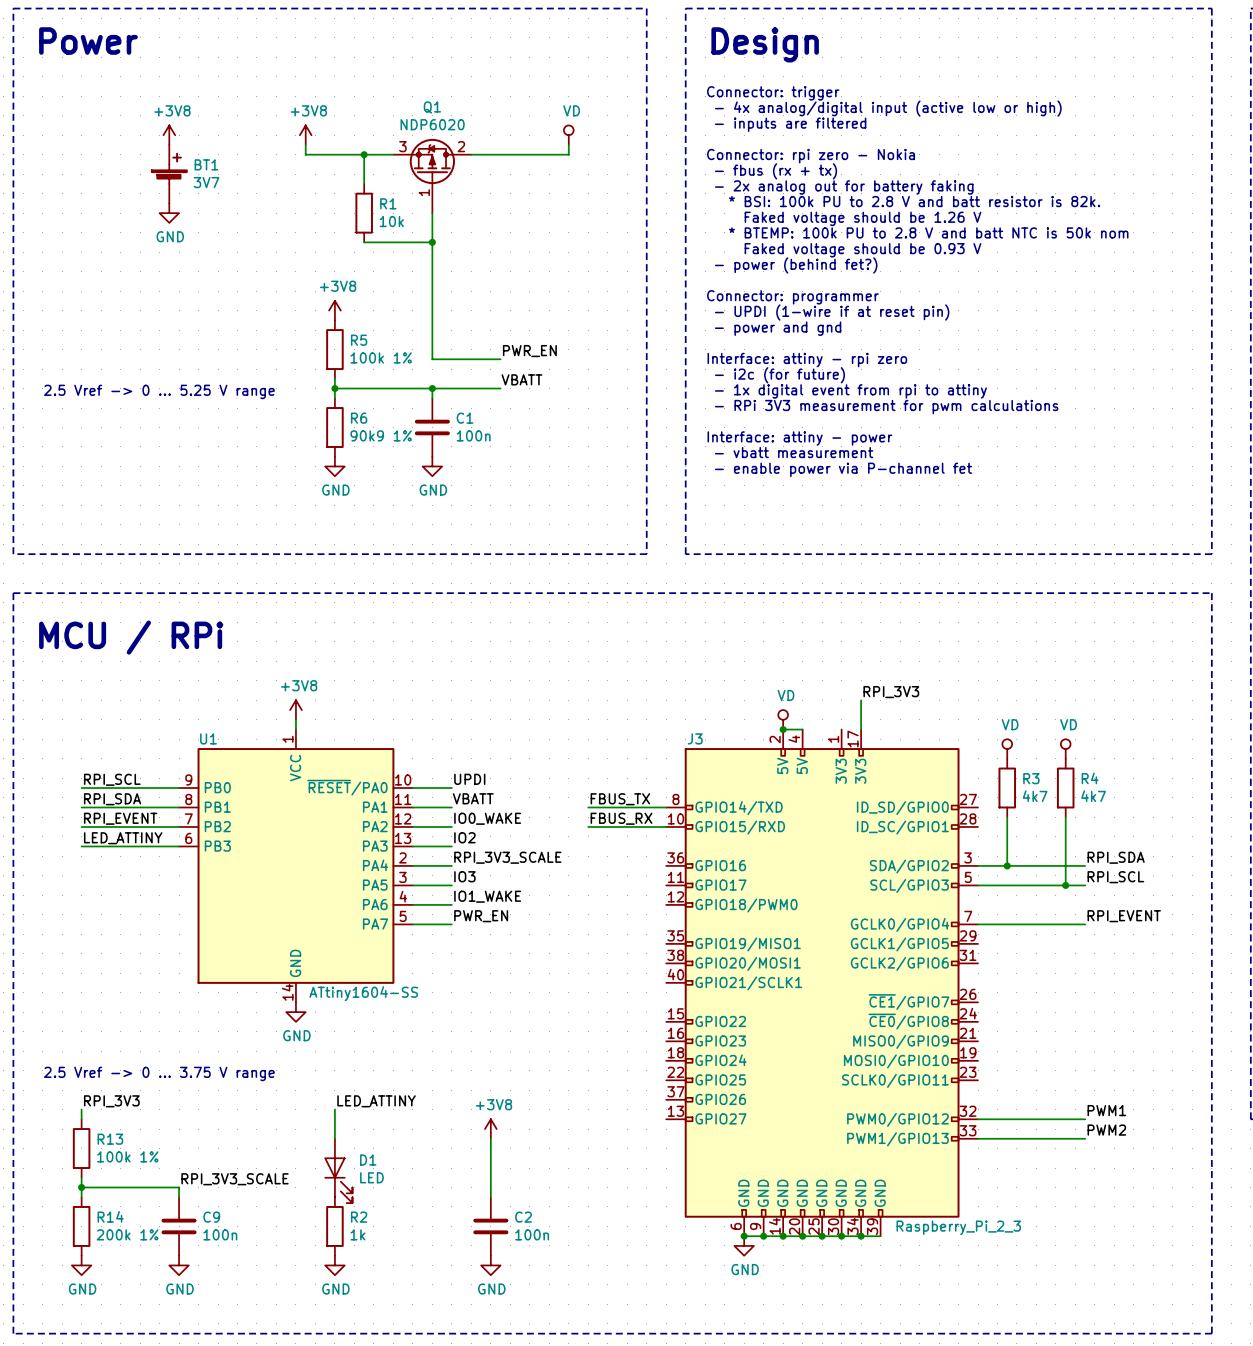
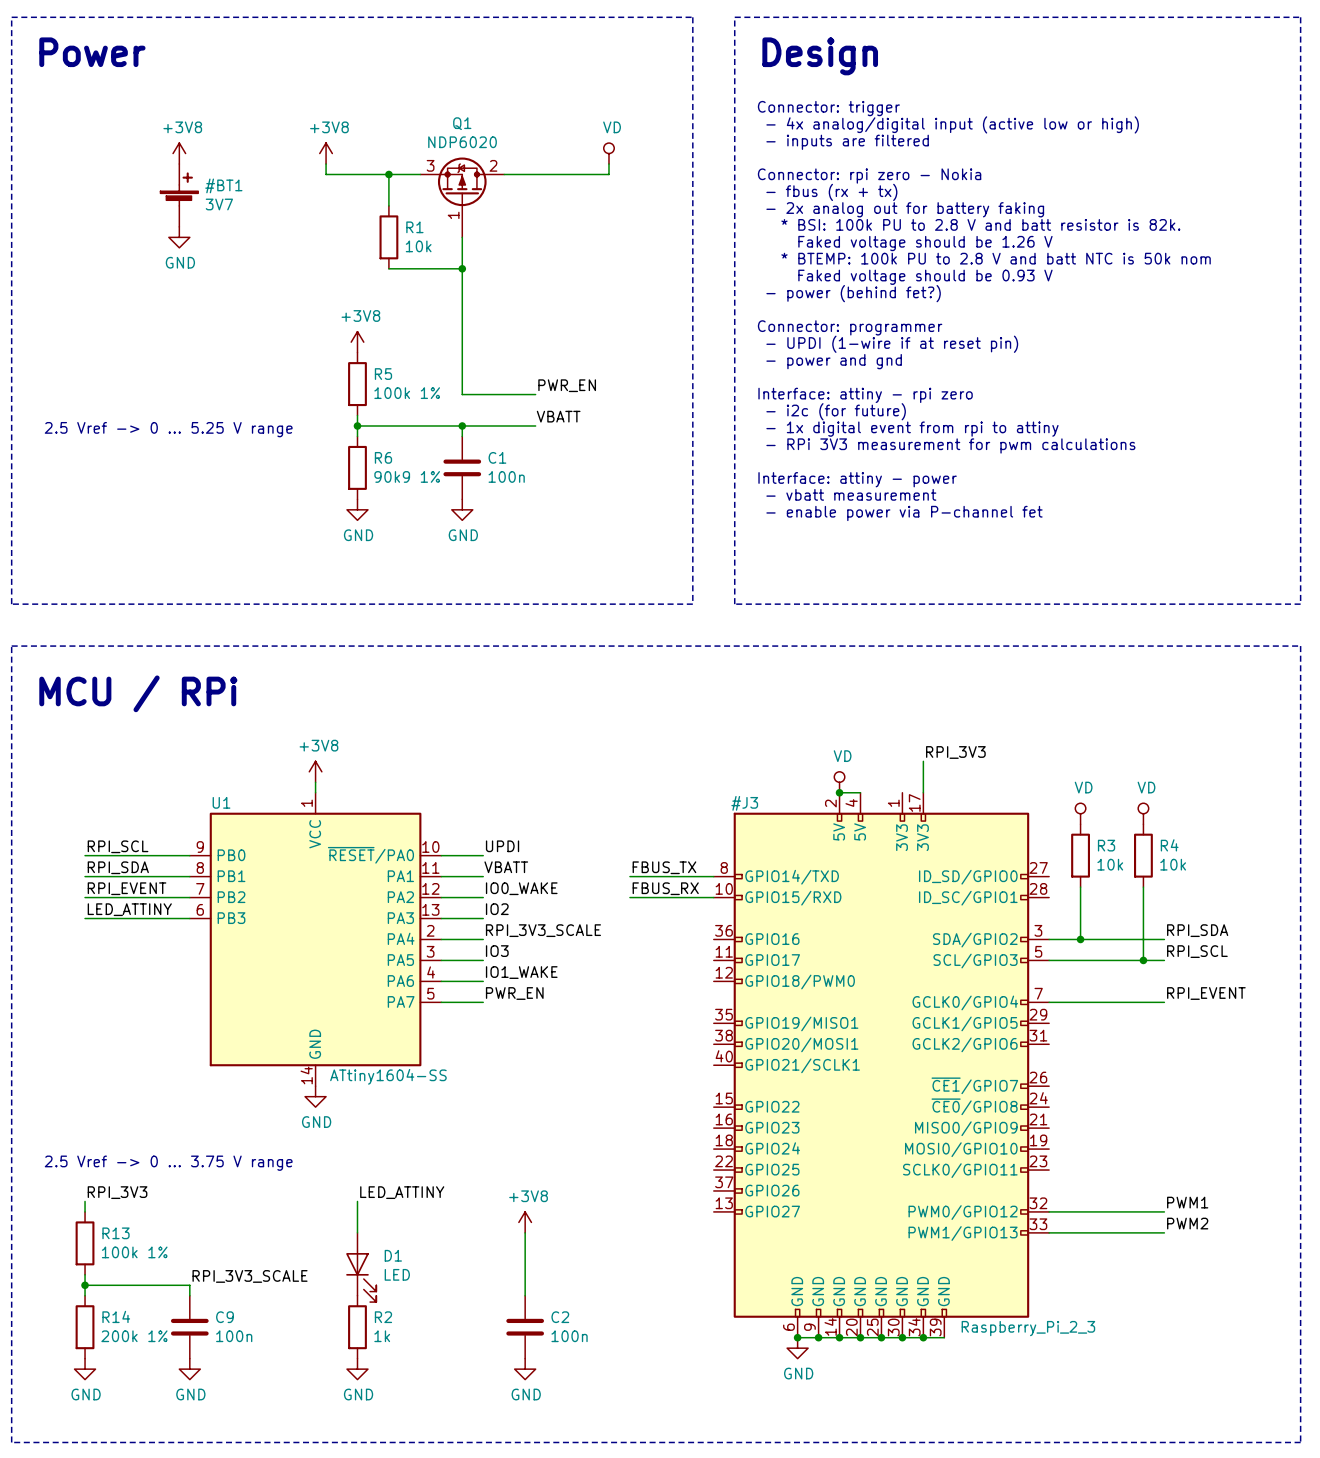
BT1: 3V7 (169, 174) -> none
#BT1: none -> 3V7 (179, 195)
R3 value: 4k7 (1035, 796) -> 10k (1110, 864)
R4 value: 4k7 (1093, 796) -> 10k (1173, 864)
J3: Raspberry_Pi_2_3 (822, 982) -> none
#J3: none -> Raspberry_Pi_2_3 (881, 1065)

